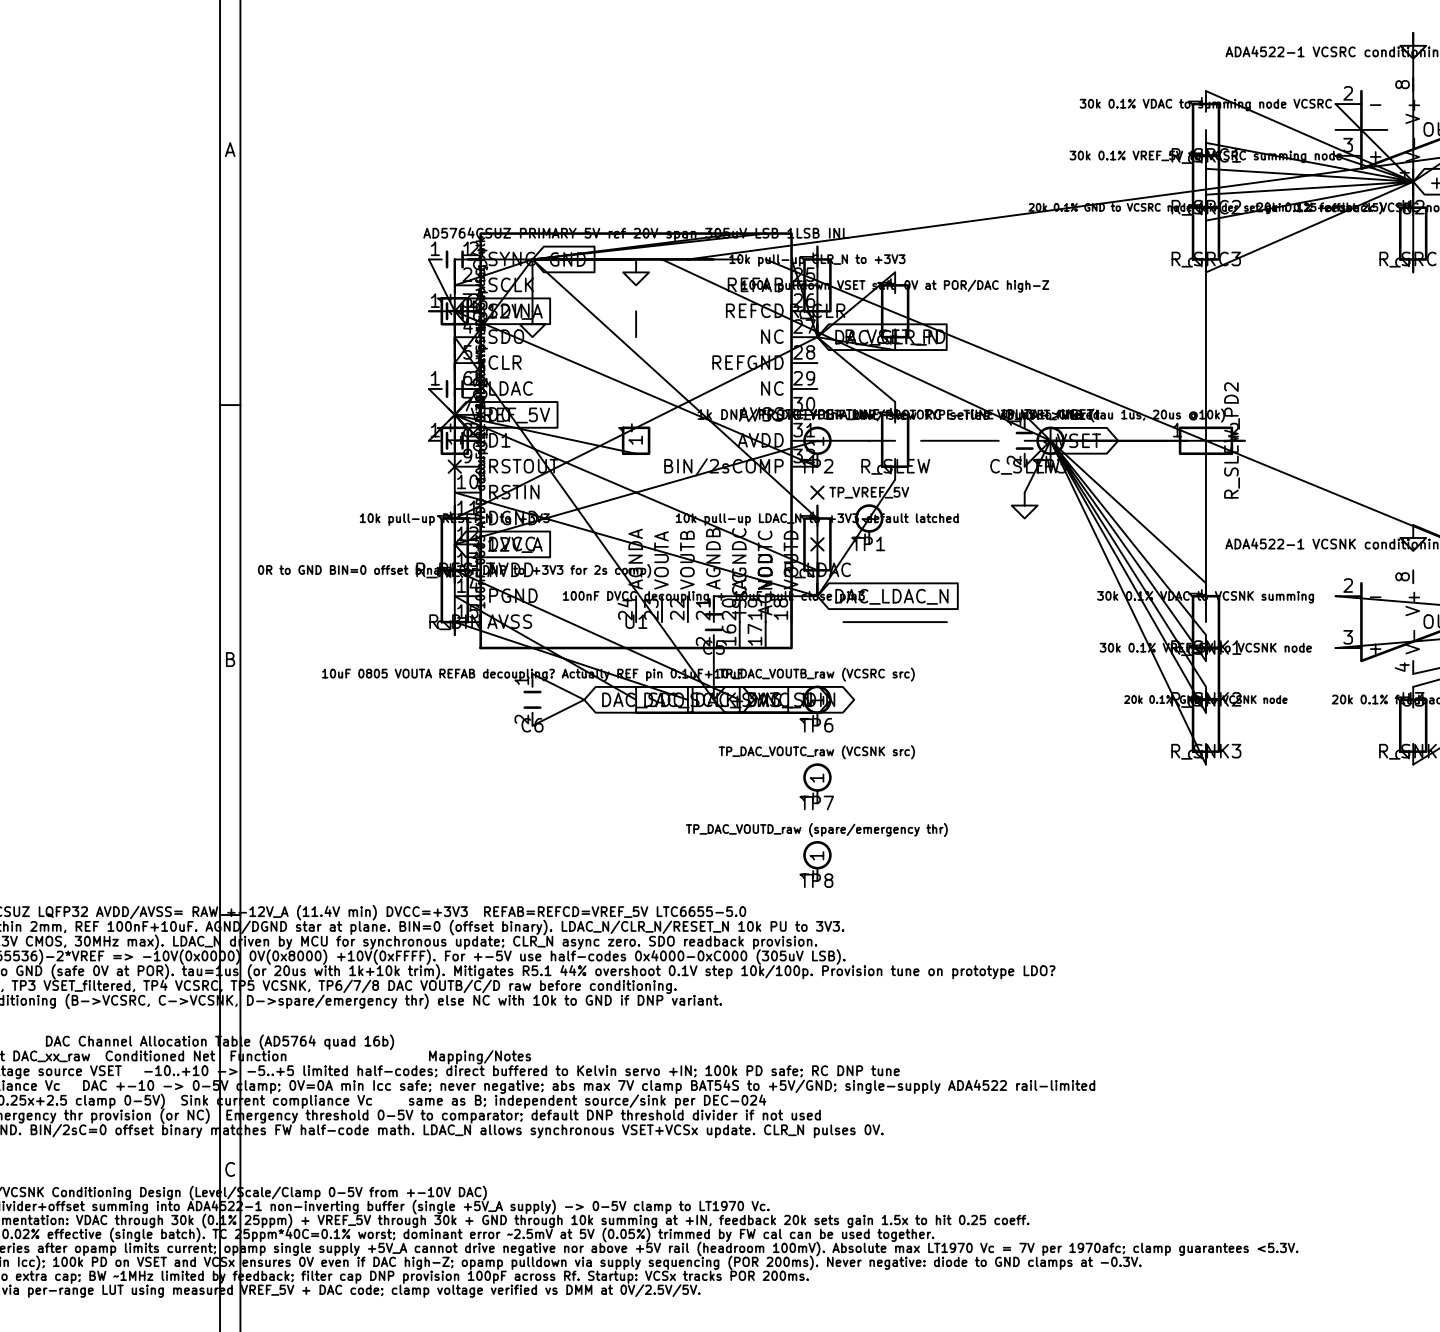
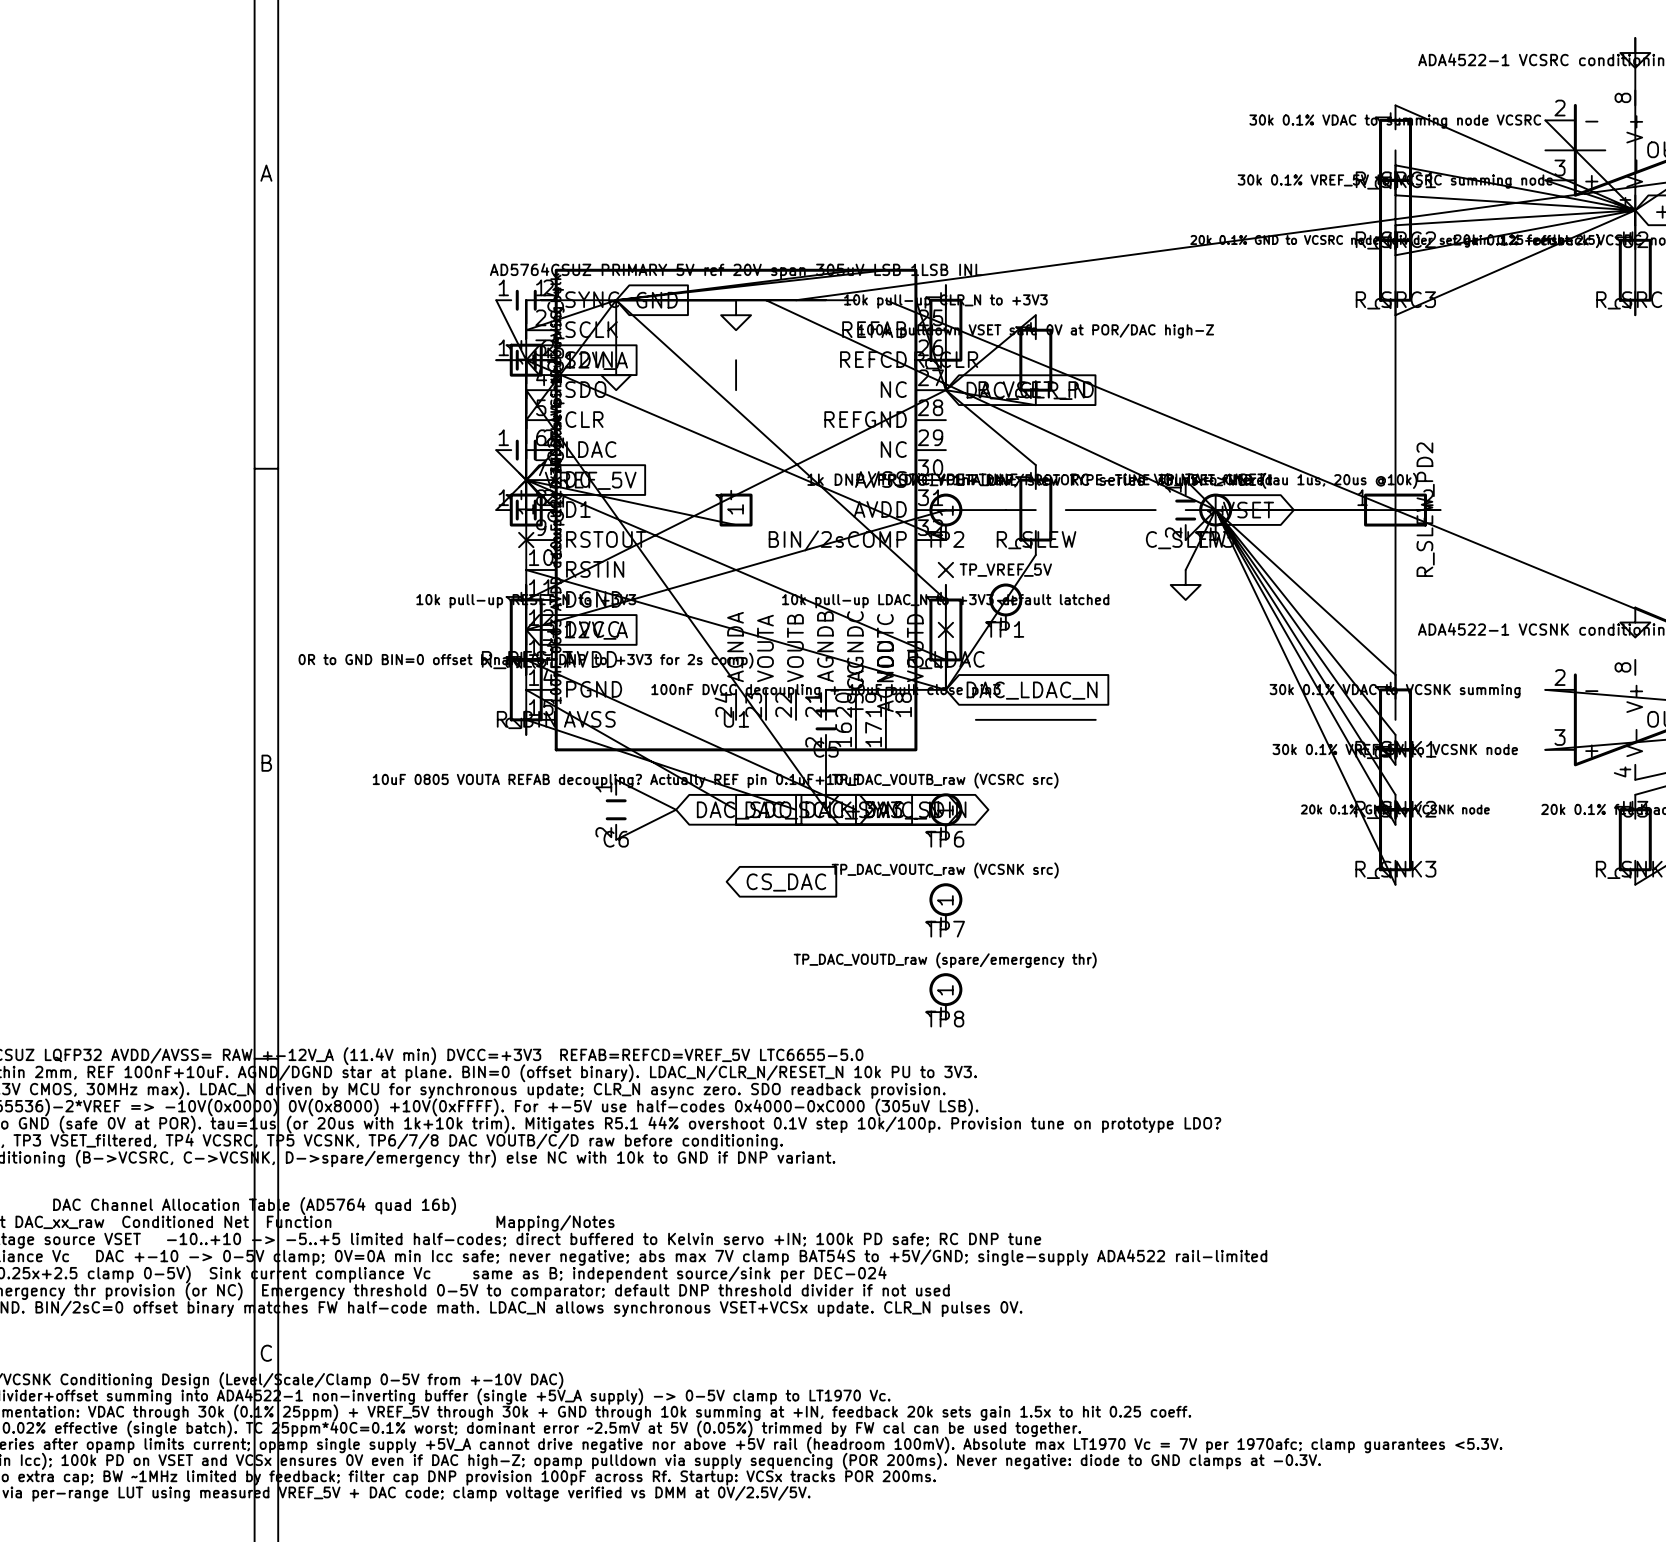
global label: none -> CS_DAC (786, 882)

